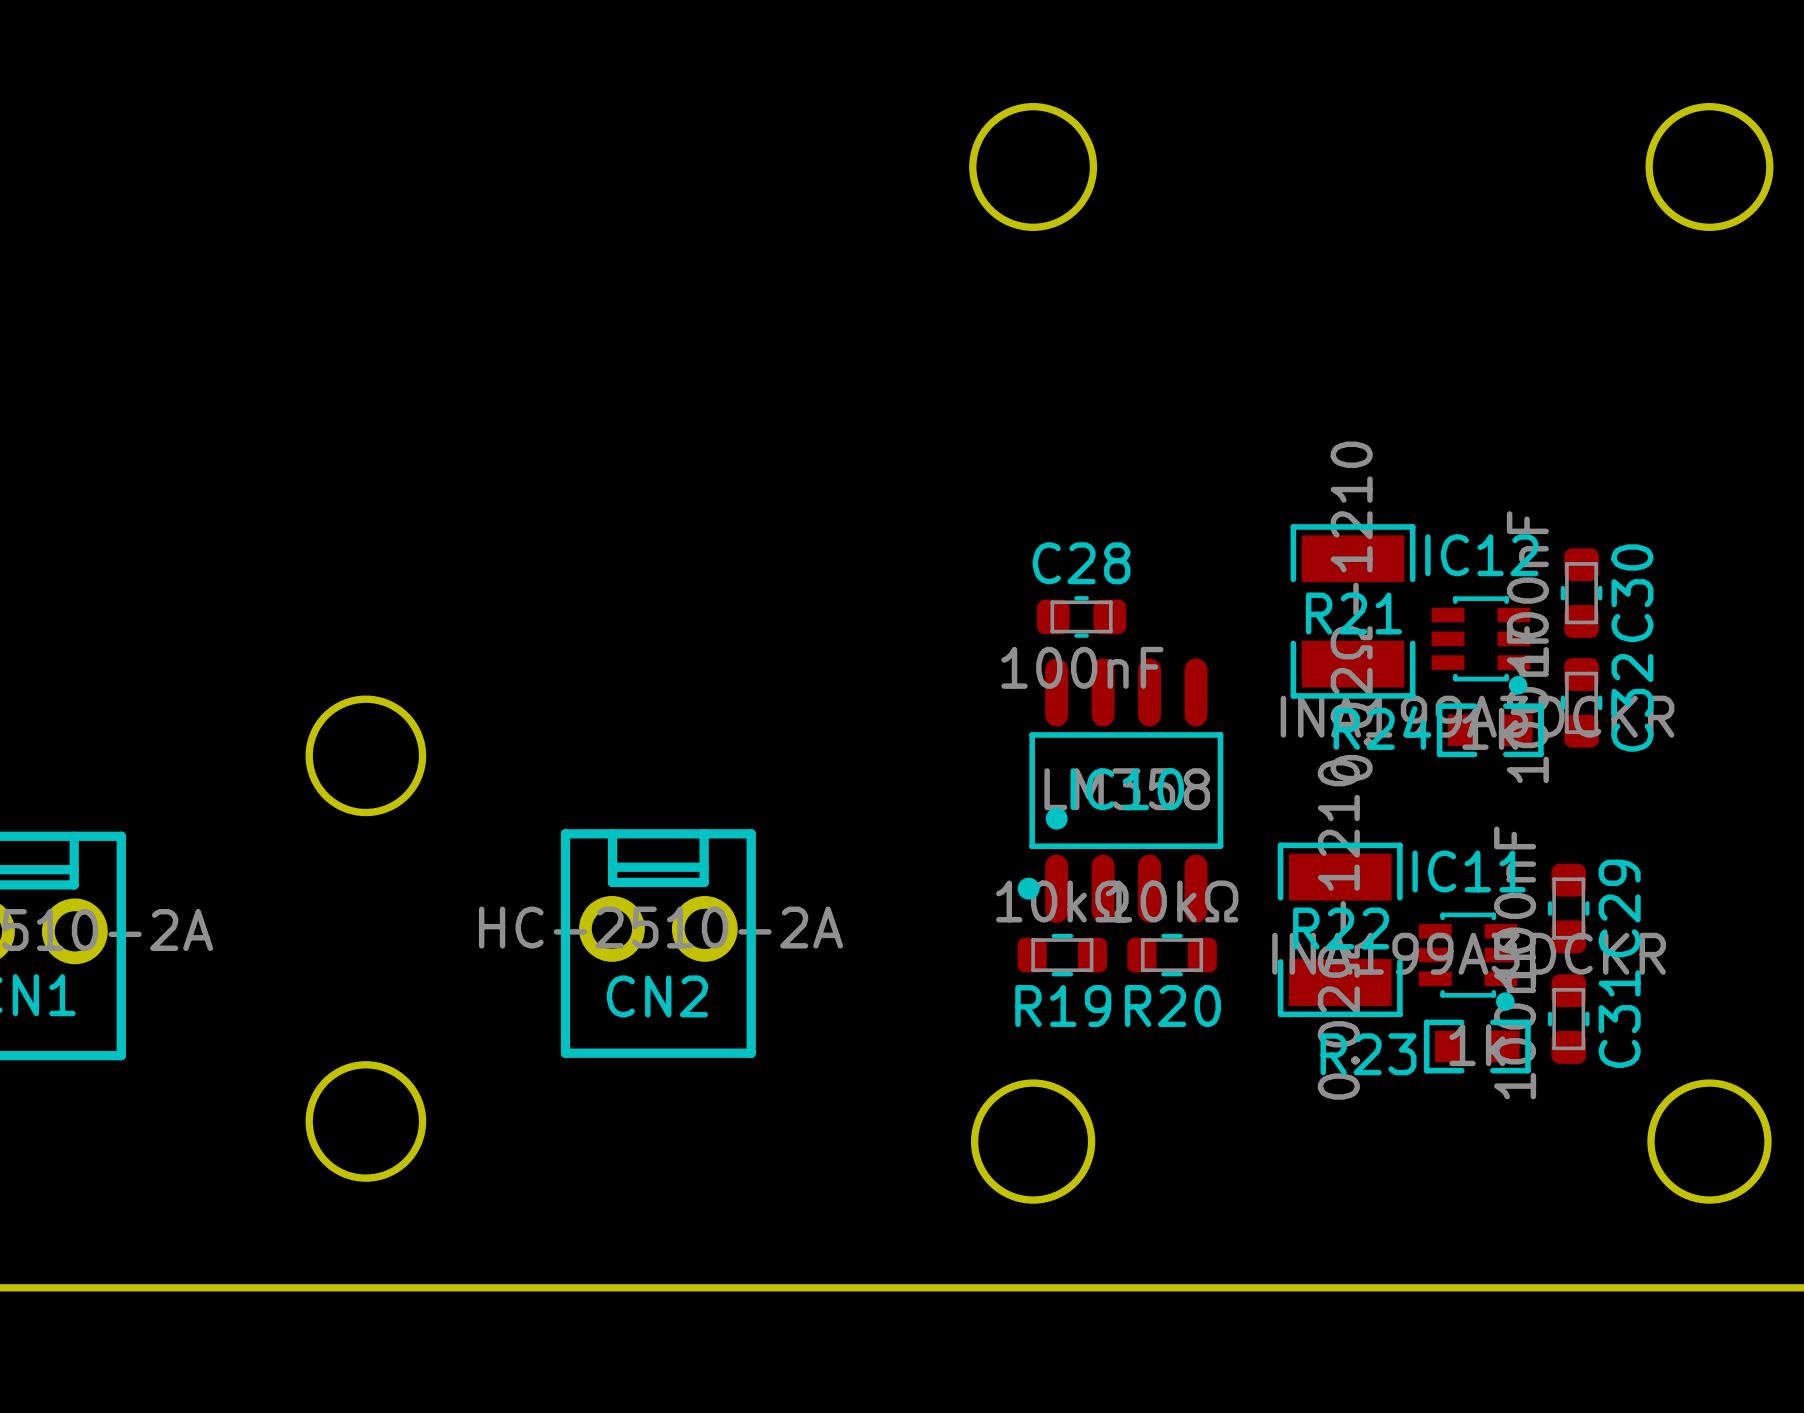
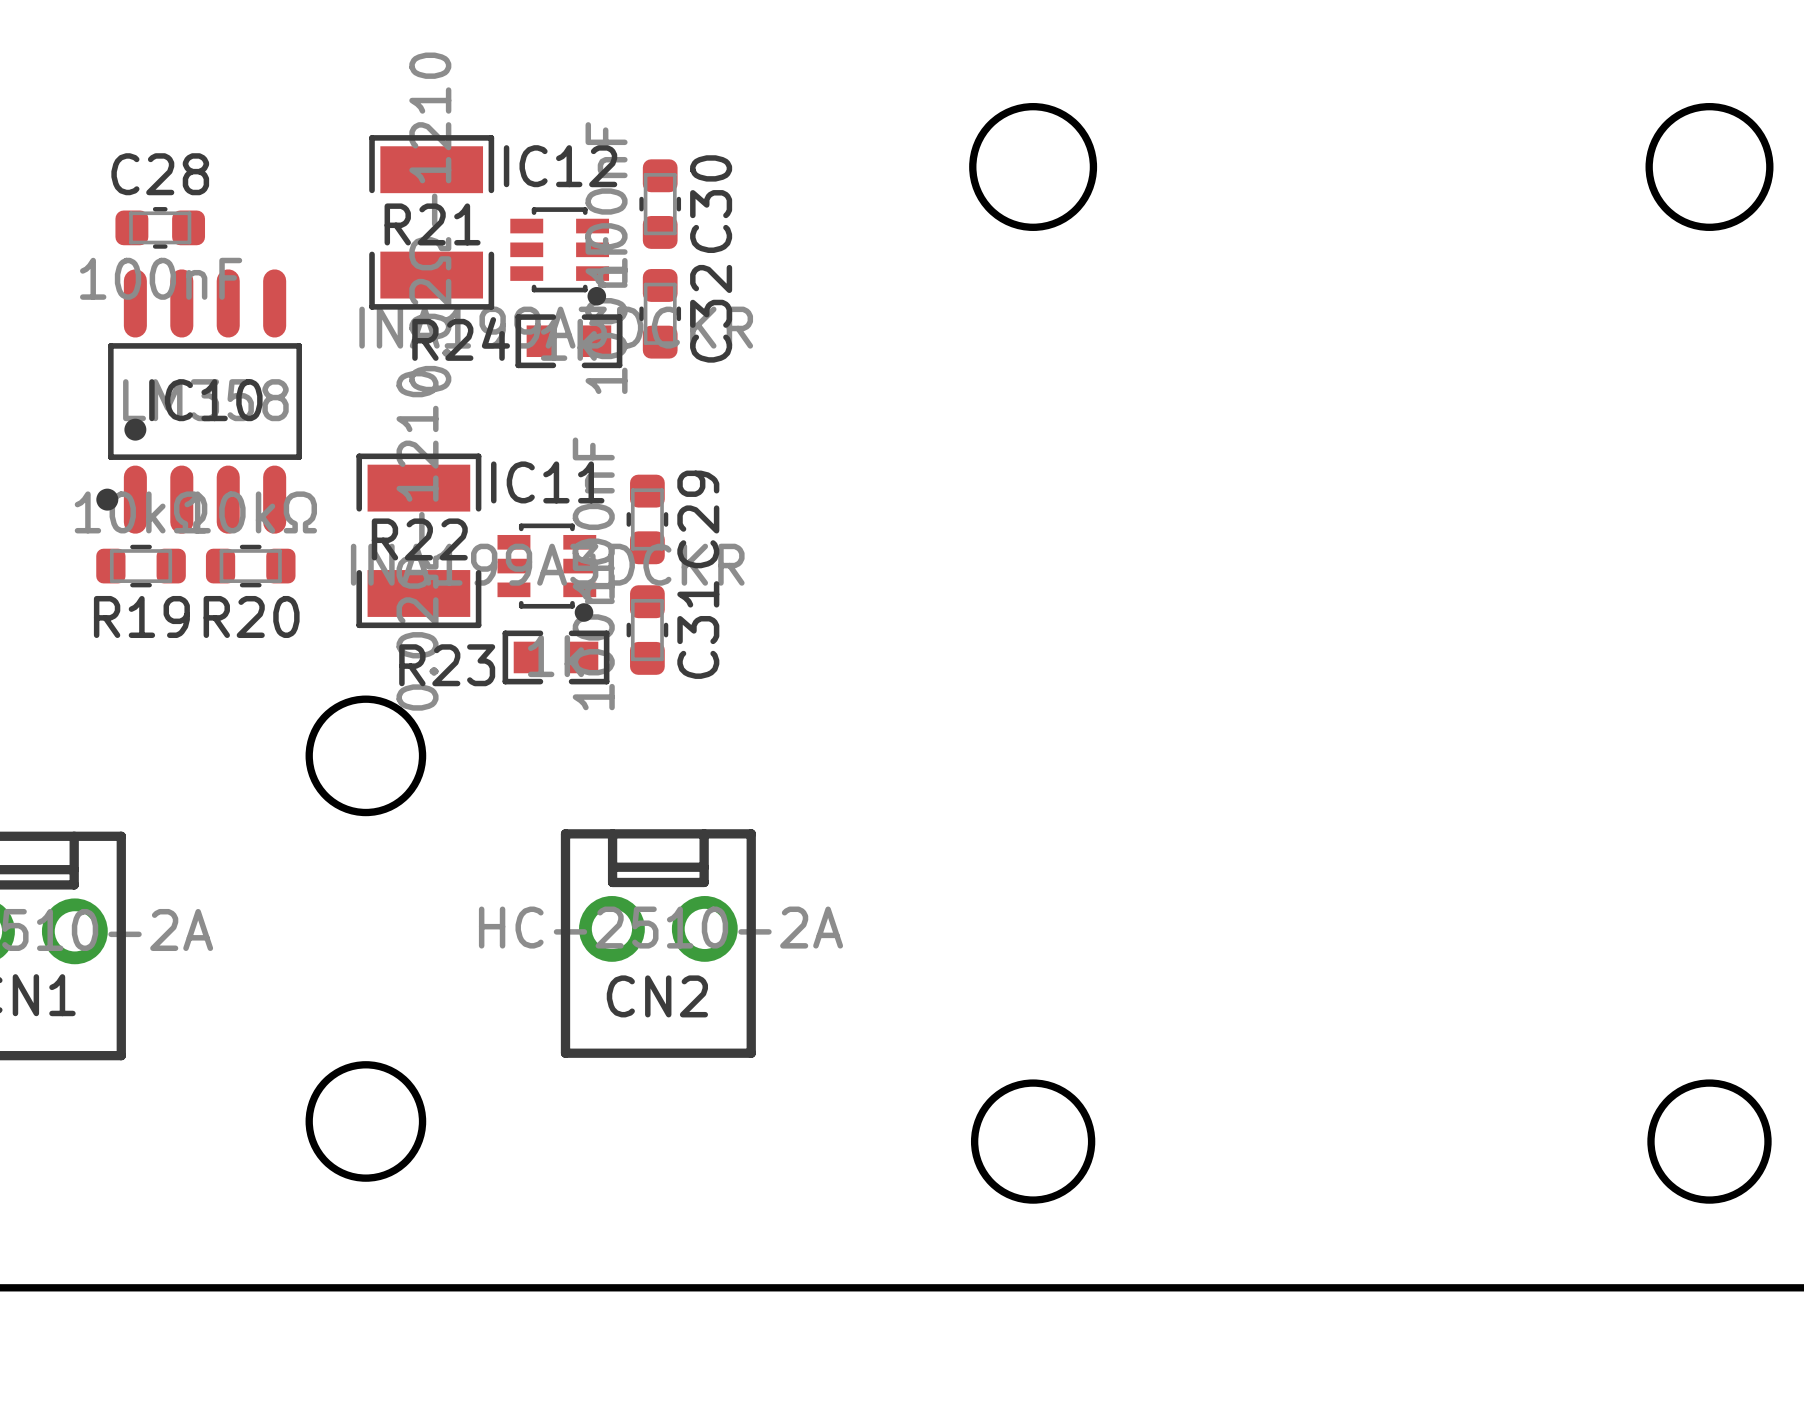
C30 position: (1581, 593) -> (660, 204)
R21 position: (1353, 611) -> (431, 222)
C28 position: (1081, 616) -> (160, 227)
IC12 position: (1480, 645) -> (559, 256)
C32 position: (1581, 702) -> (660, 313)
R24 position: (1490, 730) -> (568, 341)
IC10 position: (1120, 790) -> (199, 401)
C29 position: (1568, 908) -> (647, 519)
R22 position: (1340, 929) -> (418, 540)
R19 position: (1062, 955) -> (141, 566)
R20 position: (1172, 955) -> (250, 566)
IC11 position: (1468, 961) -> (546, 572)
C31 position: (1568, 1019) -> (647, 630)
R23 position: (1477, 1046) -> (556, 657)

